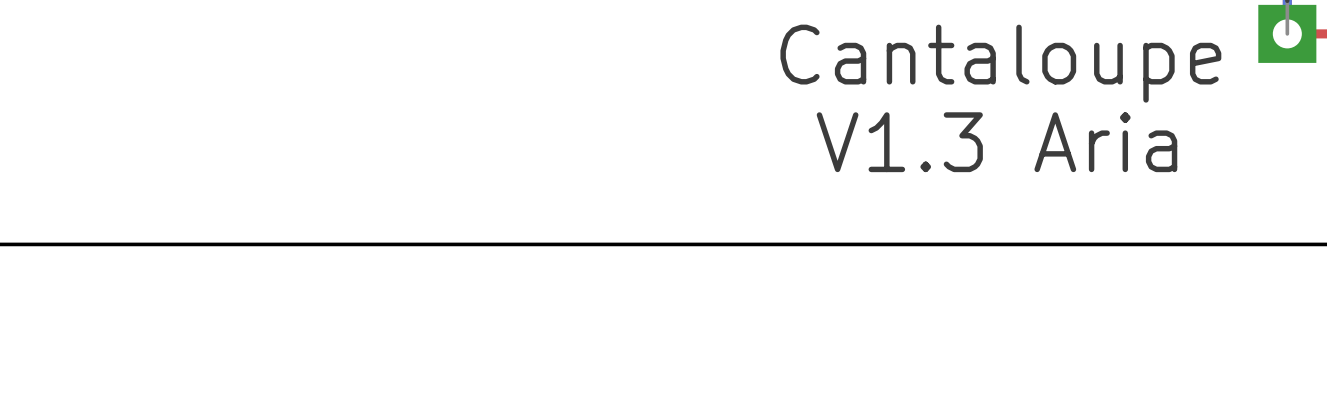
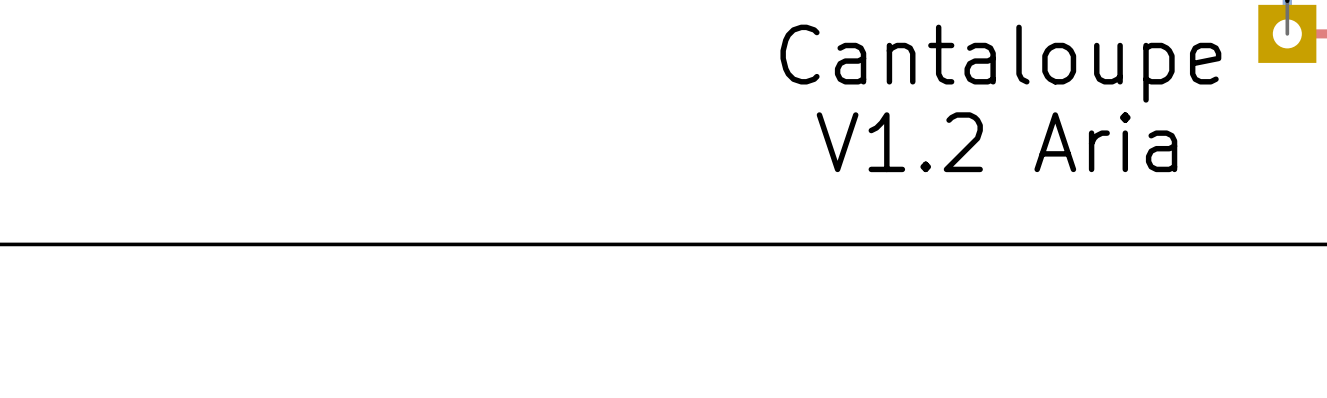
text: V1.3 Aria (996, 142) -> V1.2 Aria (996, 142)

